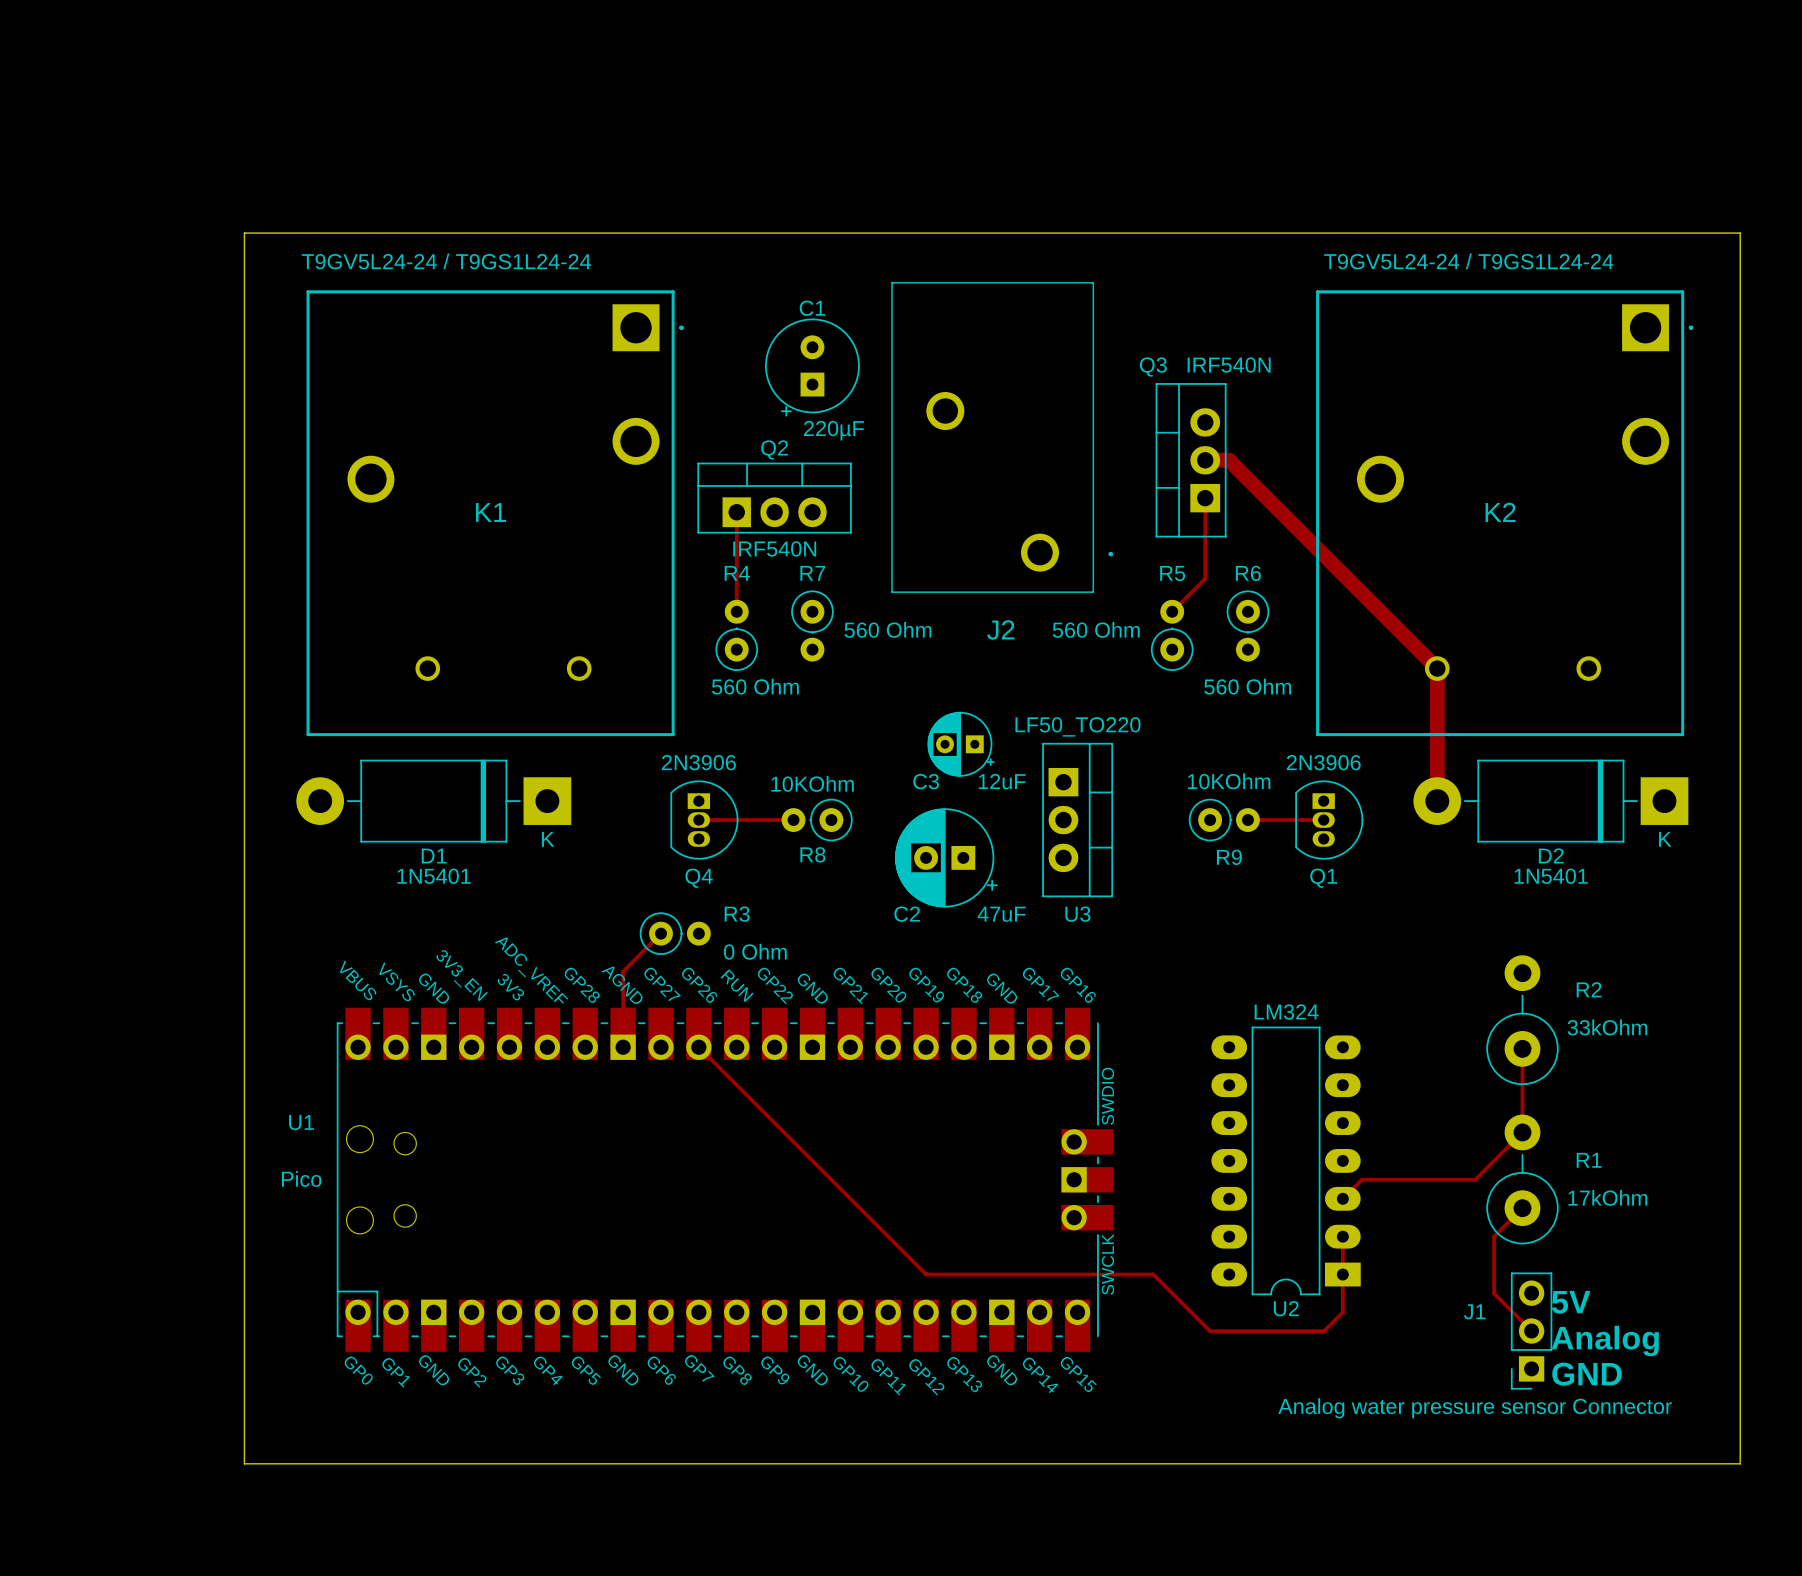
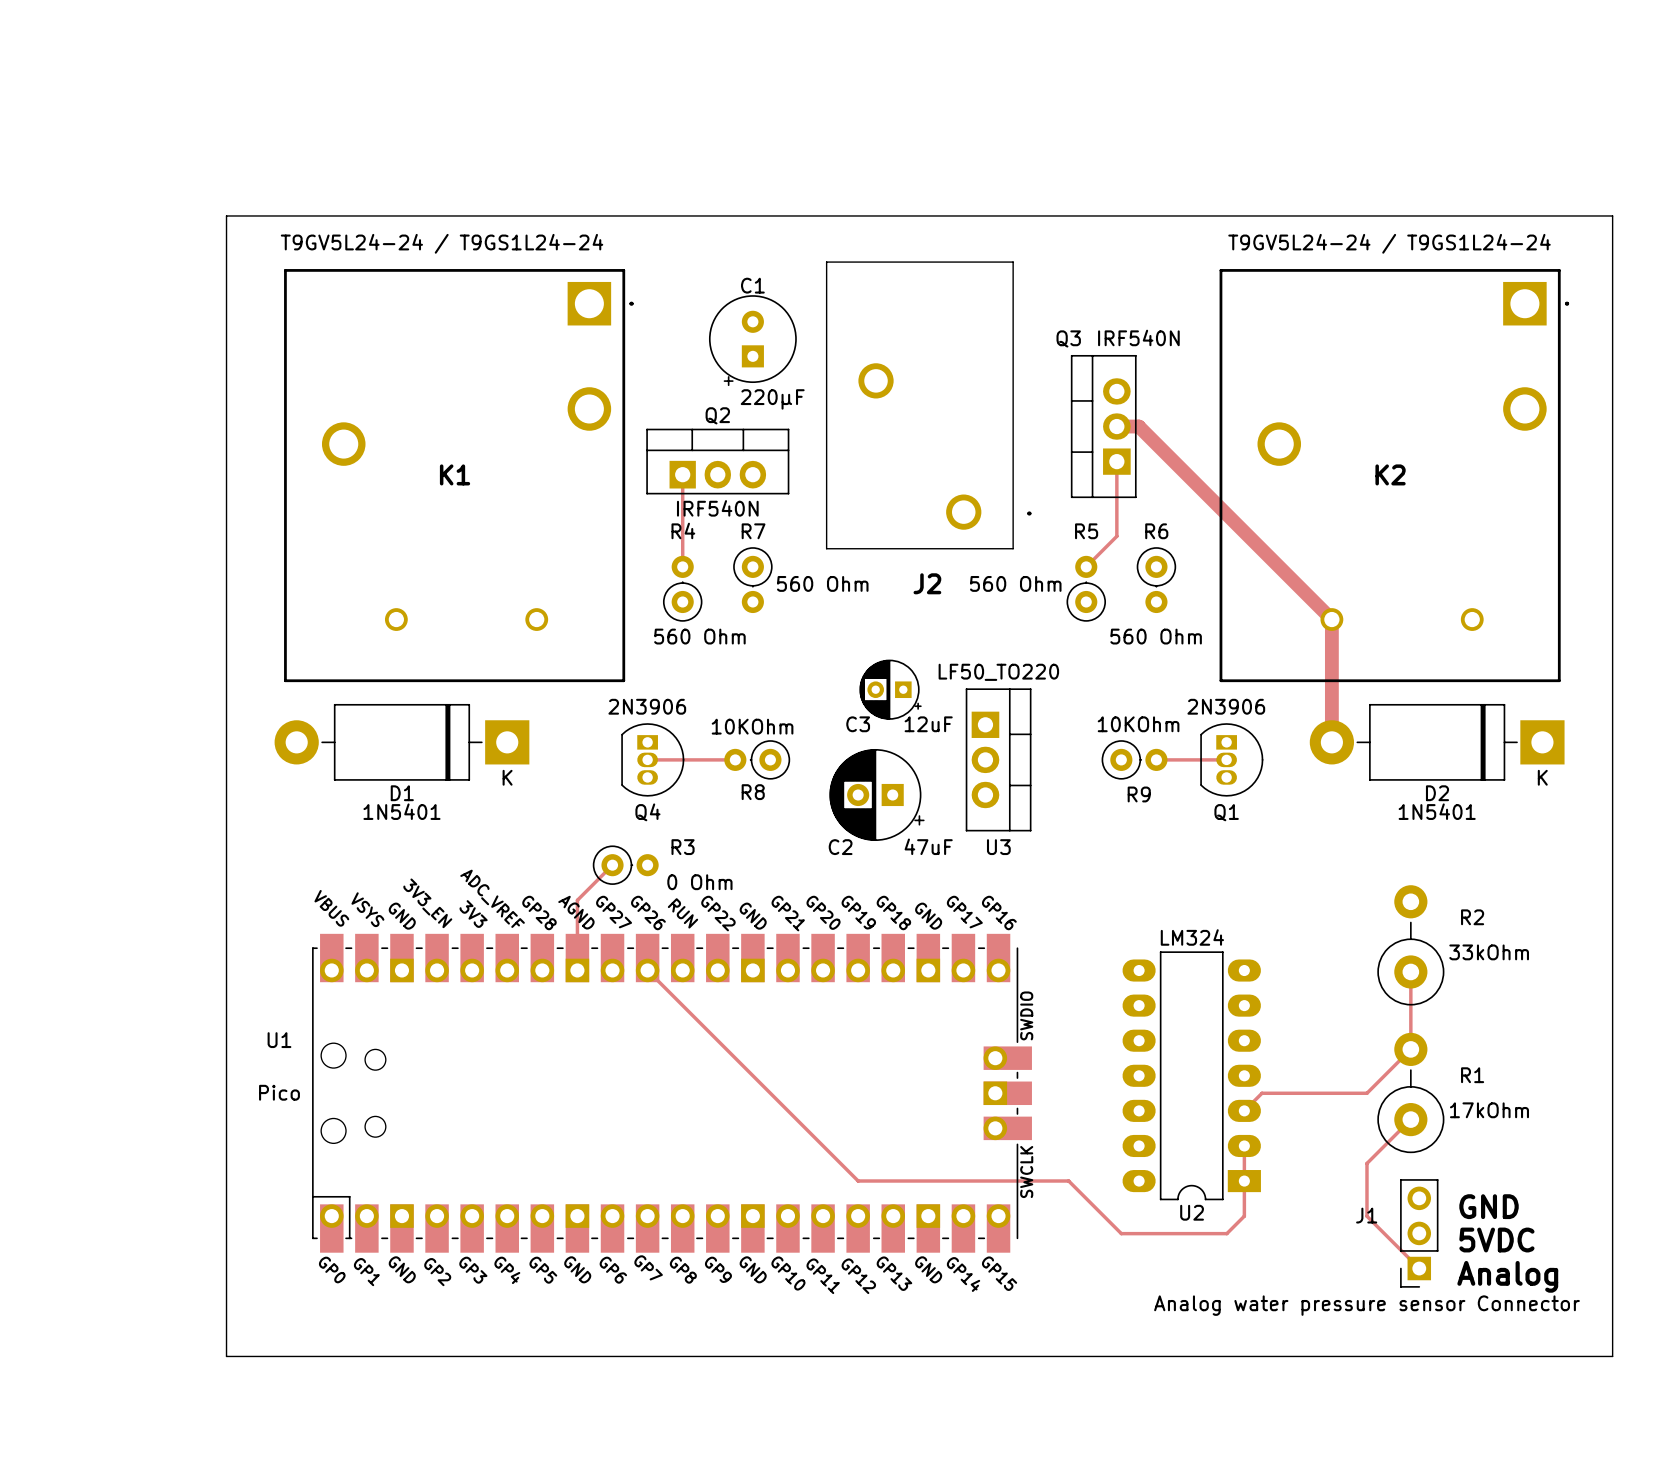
track: (1494, 1236) (1494, 1293) (1531, 1331) -> (1384, 1145) (1366, 1163) (1366, 1216) (1419, 1268)
text: 5V (1571, 1302) -> 5VDC (1496, 1240)
text position: Analog (1605, 1340) -> Analog (1507, 1276)
text position: GND (1587, 1374) -> GND (1489, 1206)

